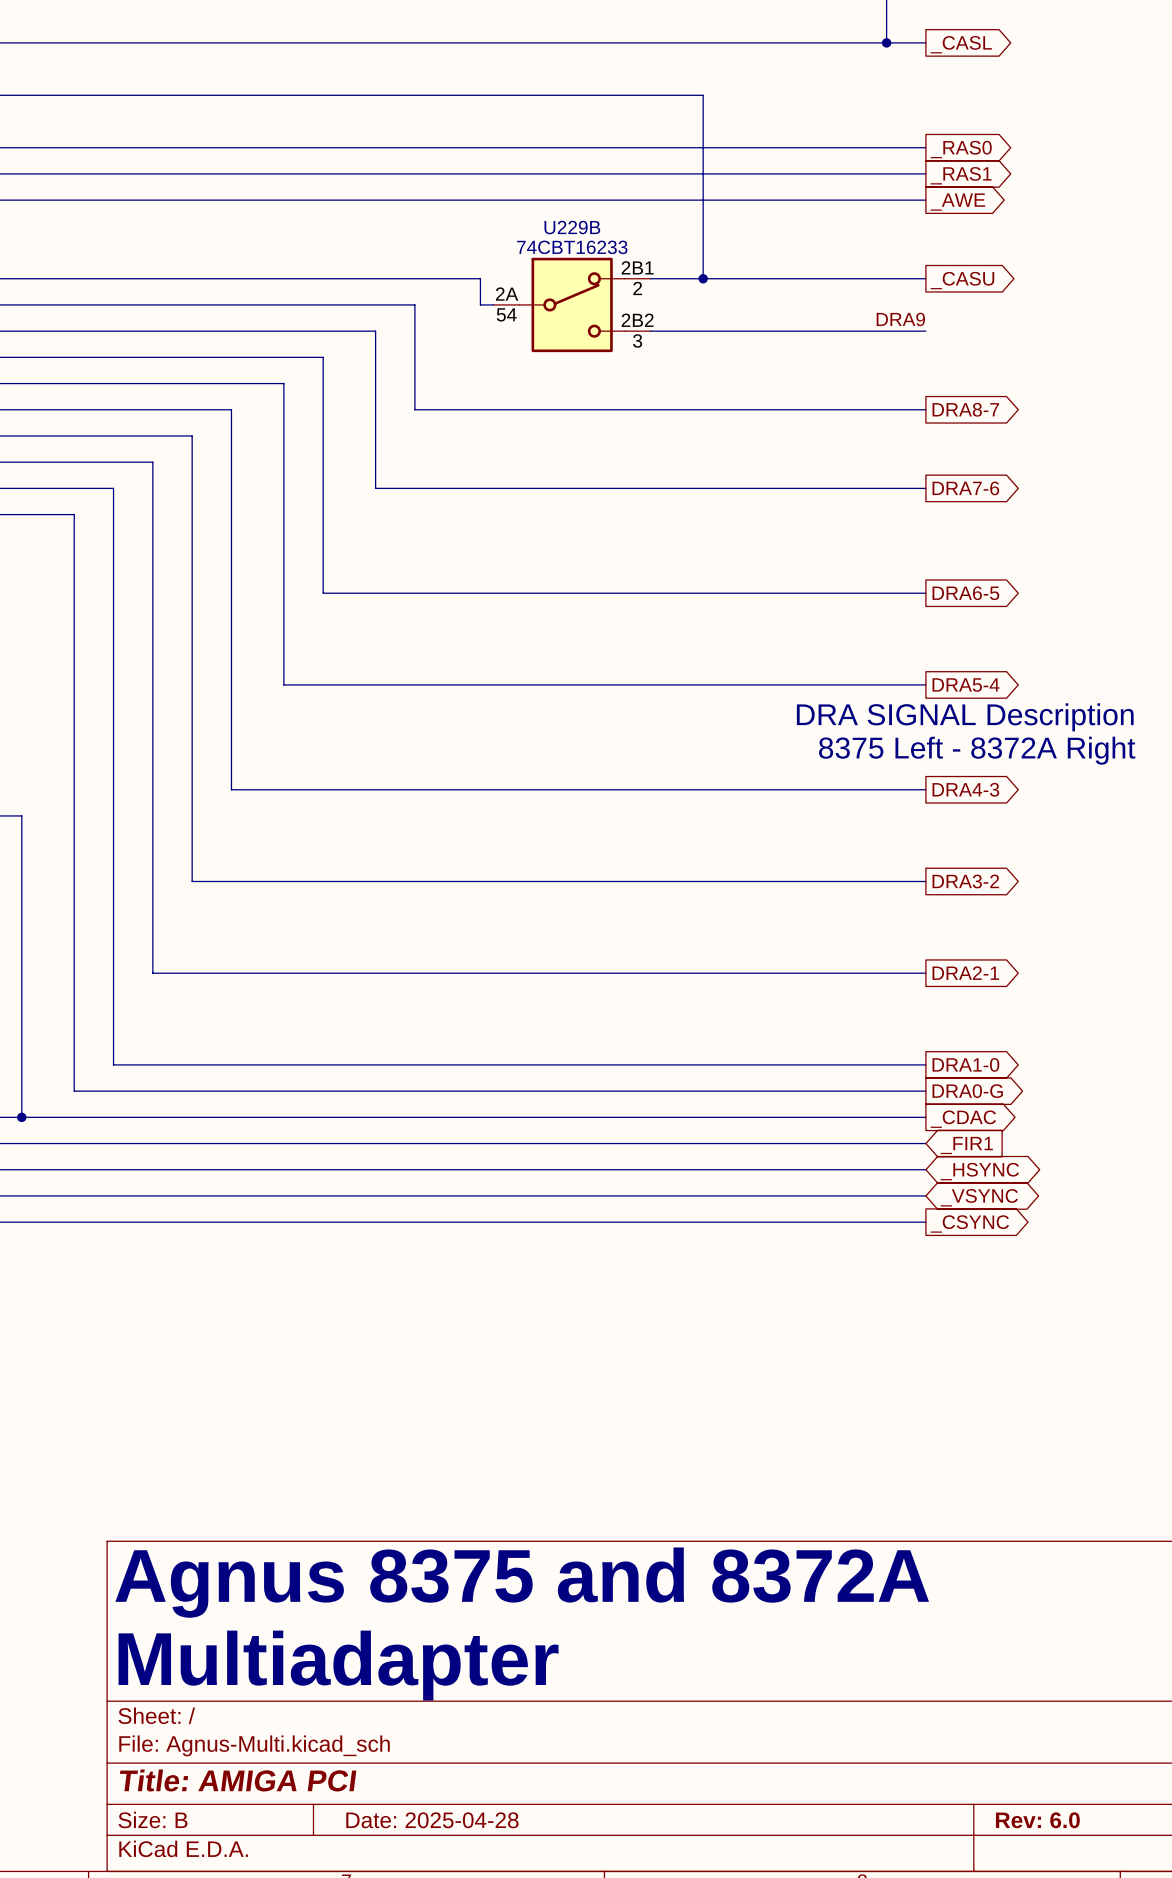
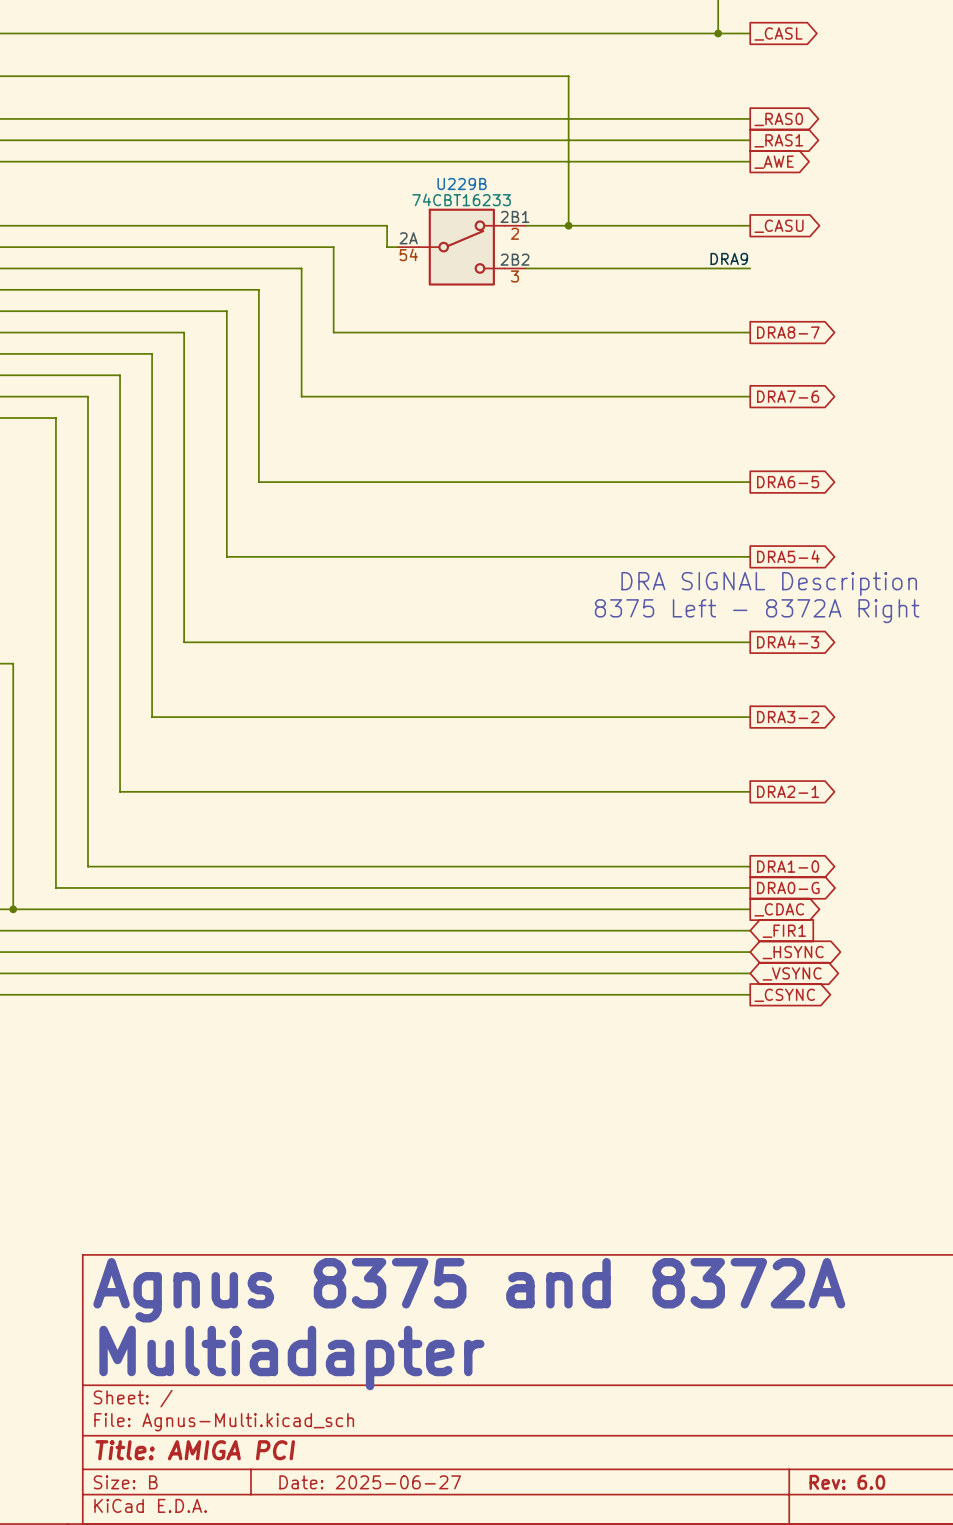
title block: Date: 2025-04-28 (432, 1820) -> Date: 2025-06-27 (370, 1482)

